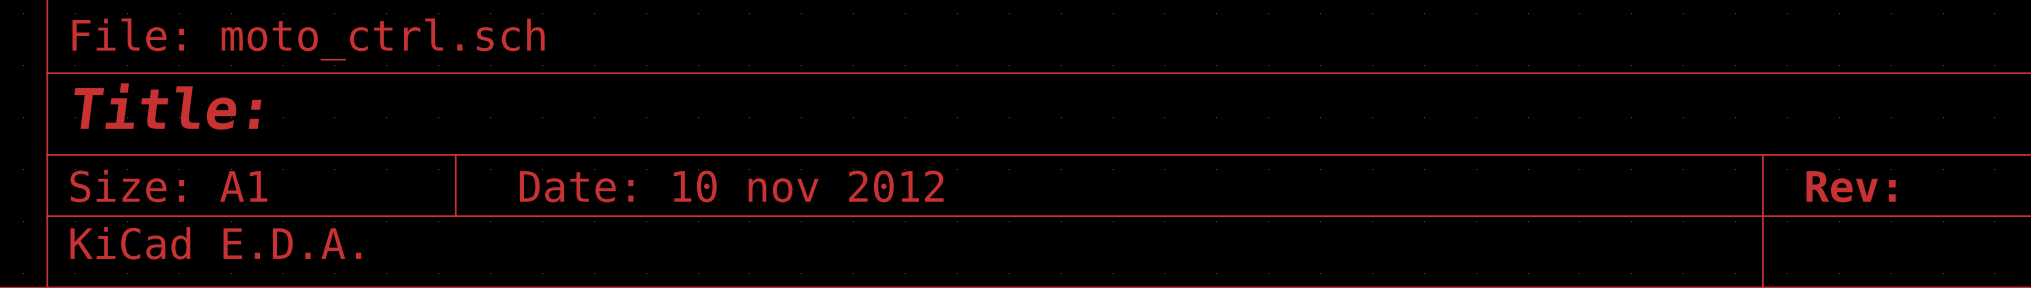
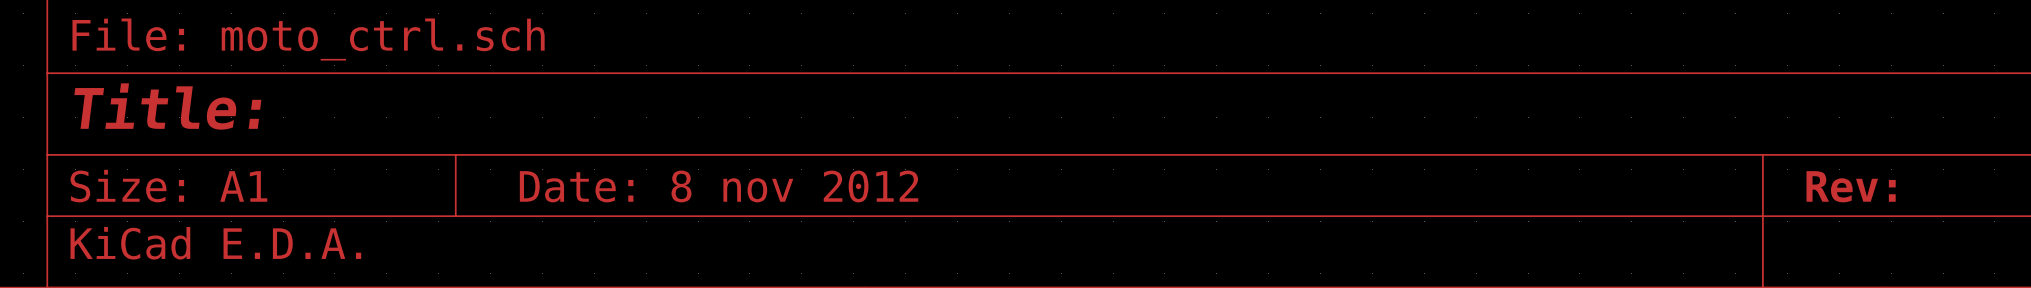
title block: Date: 10 nov 2012 (731, 186) -> Date: 8 nov 2012 (719, 186)

